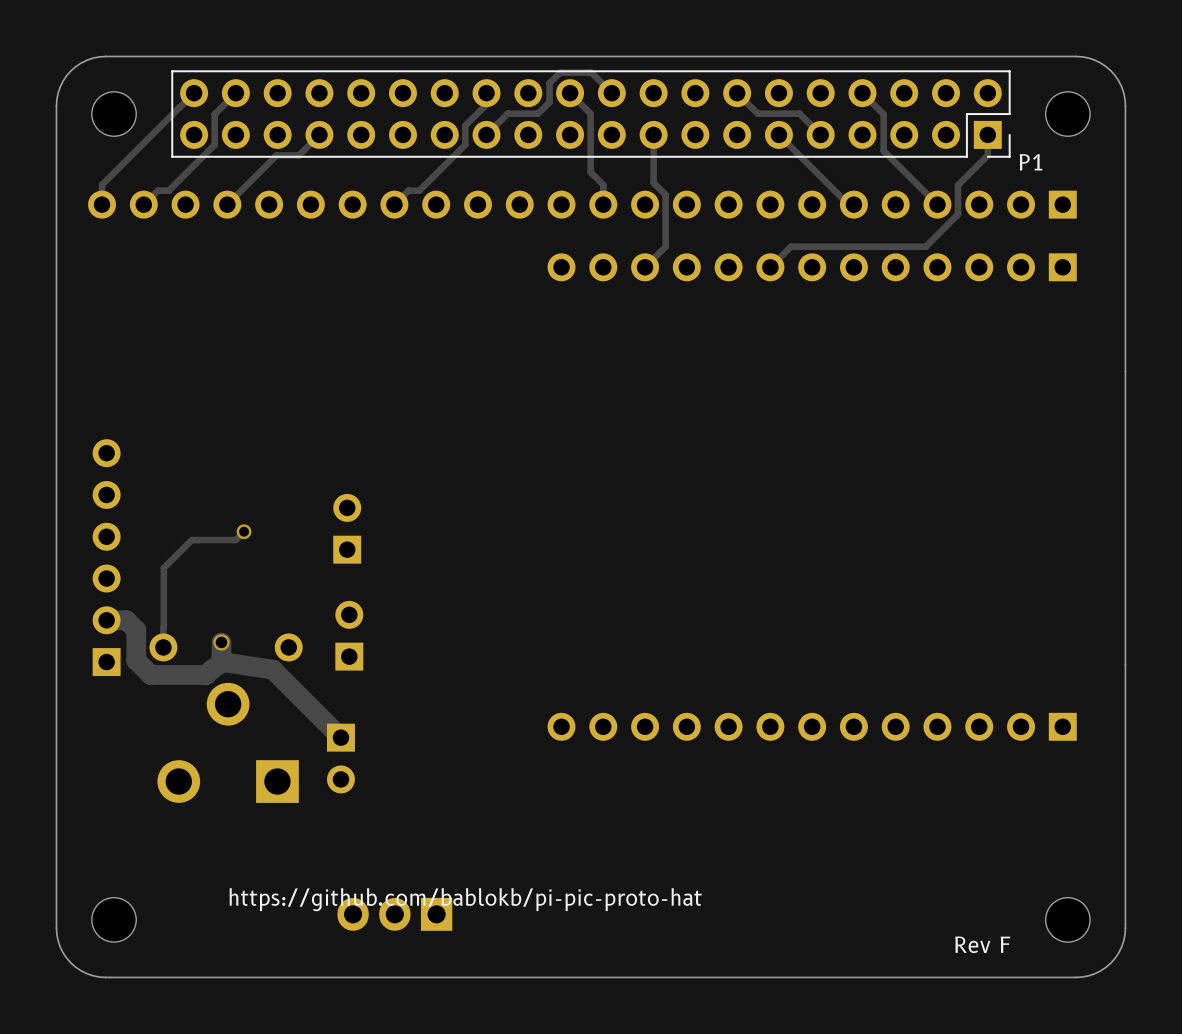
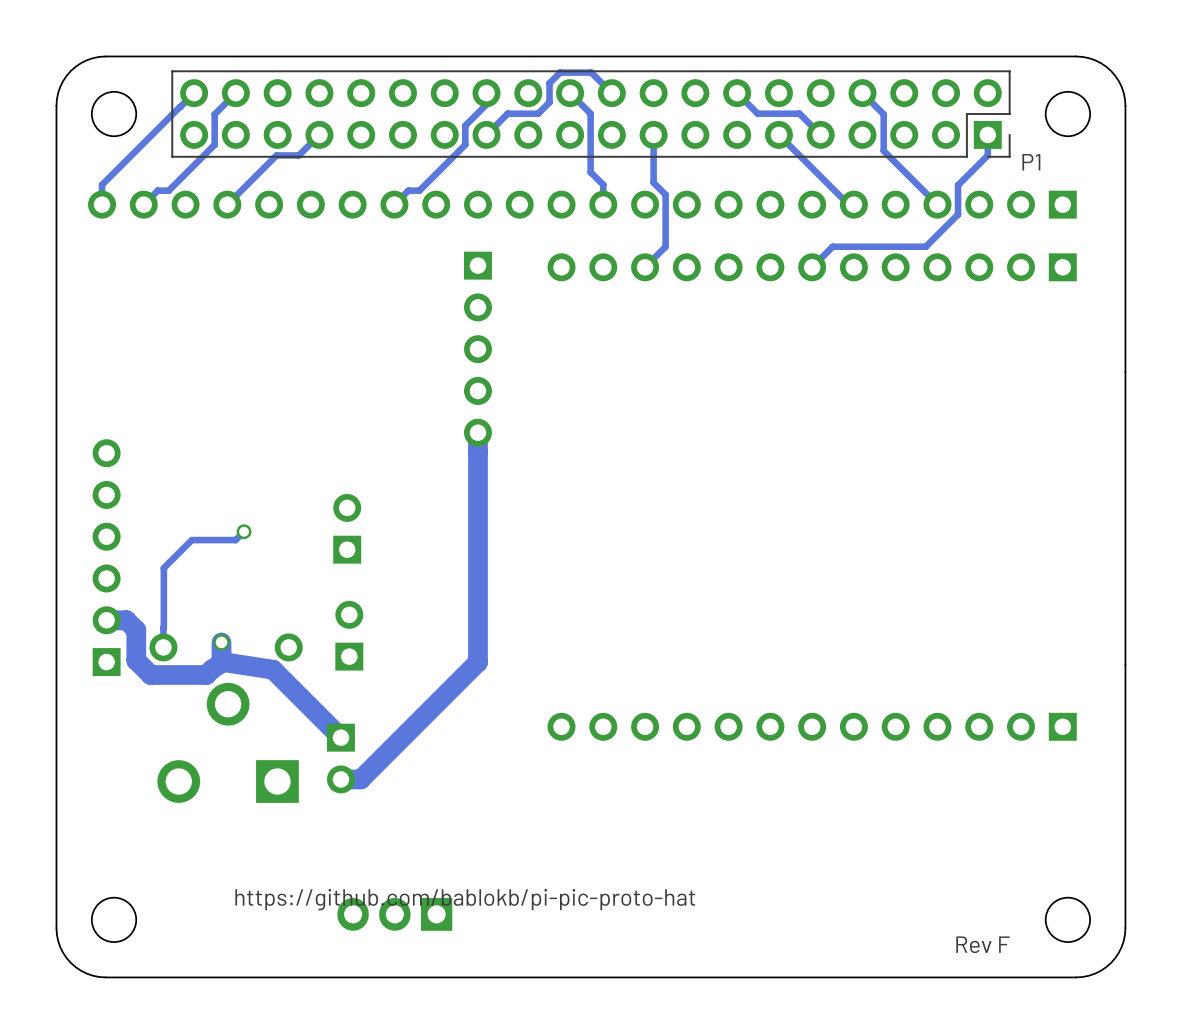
track: (832, 246) (790, 246) (770, 267) -> (832, 246) (812, 267)
part: none -> (477, 349)
track: none -> (477, 432) (477, 662) (360, 779) (340, 779)

